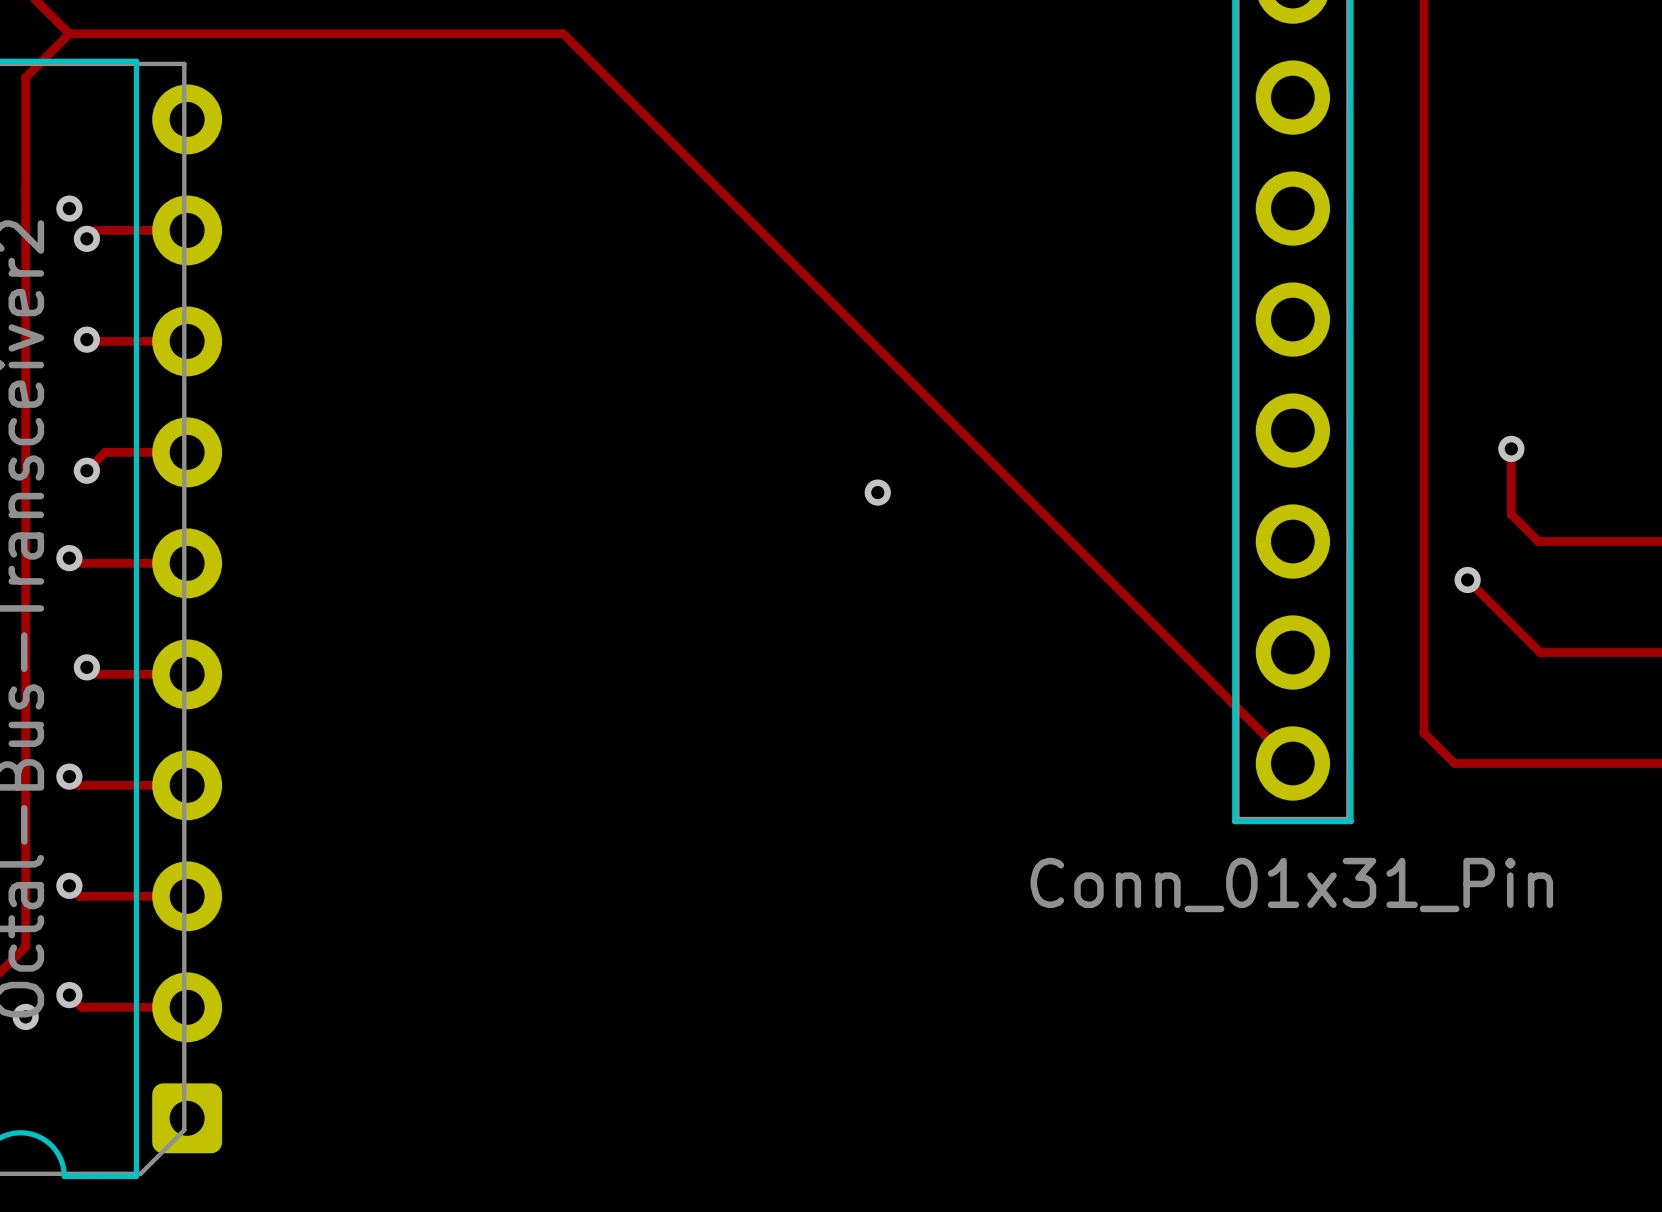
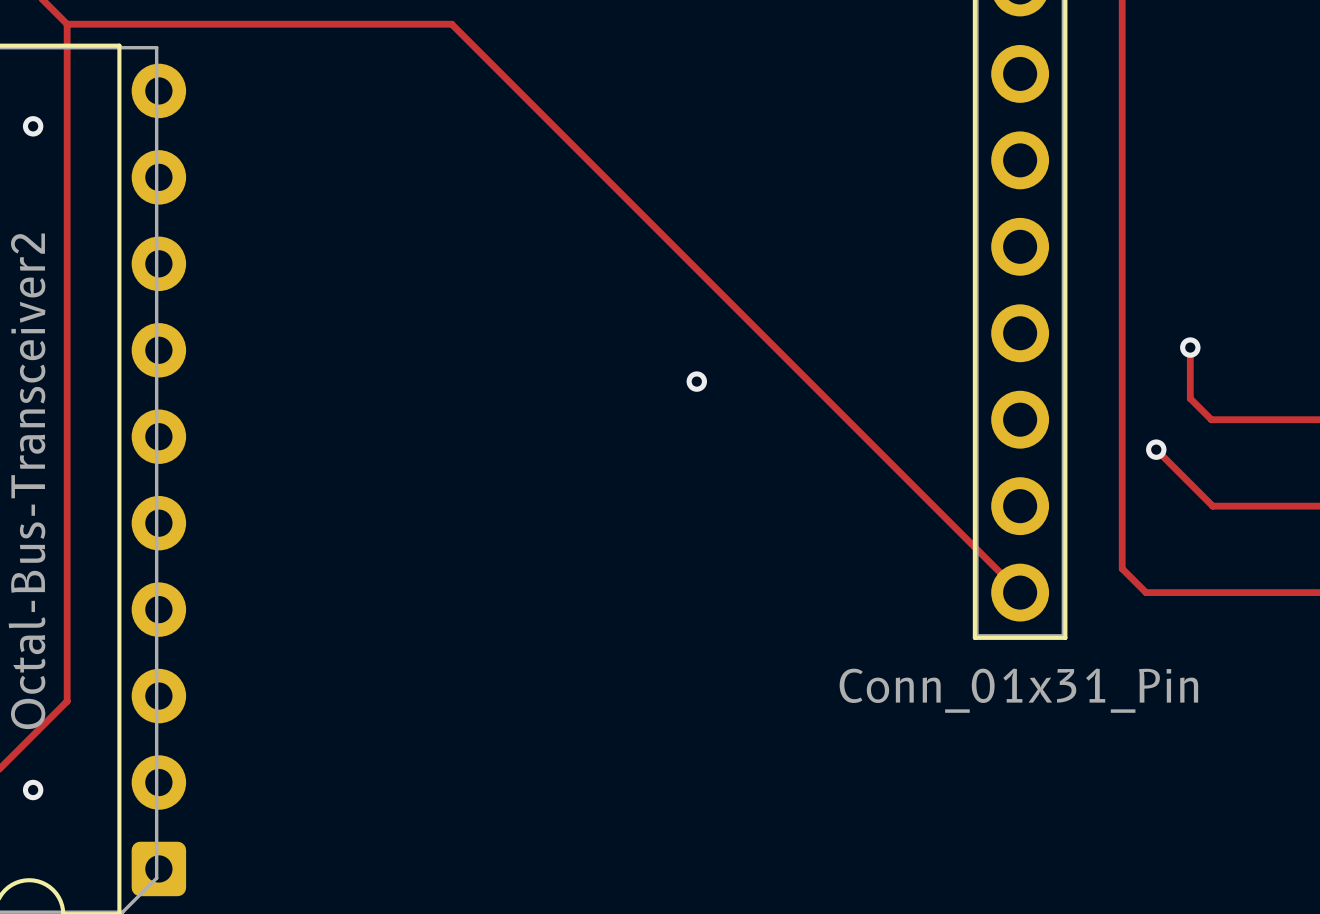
track: (69, 33) (25, 77) (25, 946) -> (67, 24) (67, 701) (33, 735)
via: none -> (33, 126)
via: (69, 208) -> none
track: (187, 230) (95, 230) (86, 238) -> none
via: (86, 238) -> none
track: (86, 339) (88, 341) (187, 341) -> none
via: (86, 339) -> none
track: (187, 452) (105, 452) (86, 470) -> none
via: (86, 470) -> none
track: (69, 558) (74, 563) (187, 563) -> none
via: (69, 558) -> none
track: (86, 667) (93, 674) (187, 674) -> none
via: (86, 667) -> none
track: (69, 776) (78, 785) (187, 785) -> none
via: (69, 776) -> none
track: (69, 885) (79, 896) (187, 896) -> none
via: (69, 885) -> none
track: (69, 995) (81, 1007) (187, 1007) -> none
via: (69, 995) -> none

